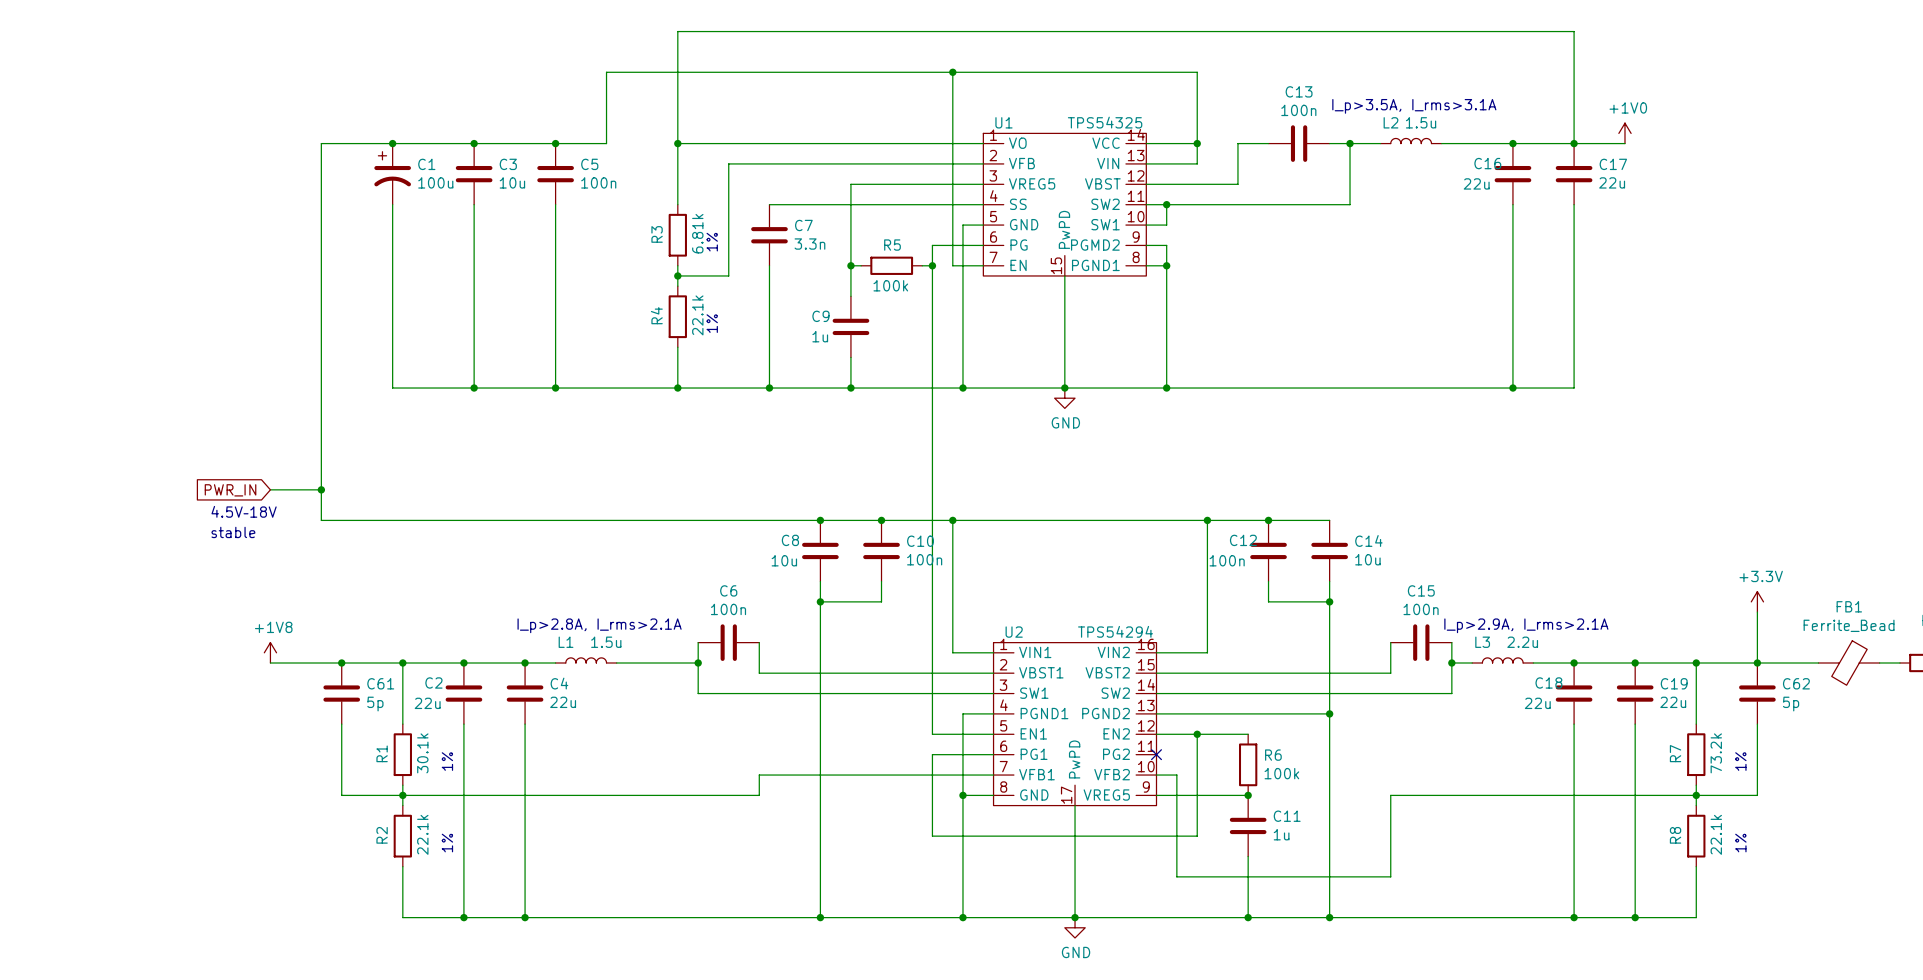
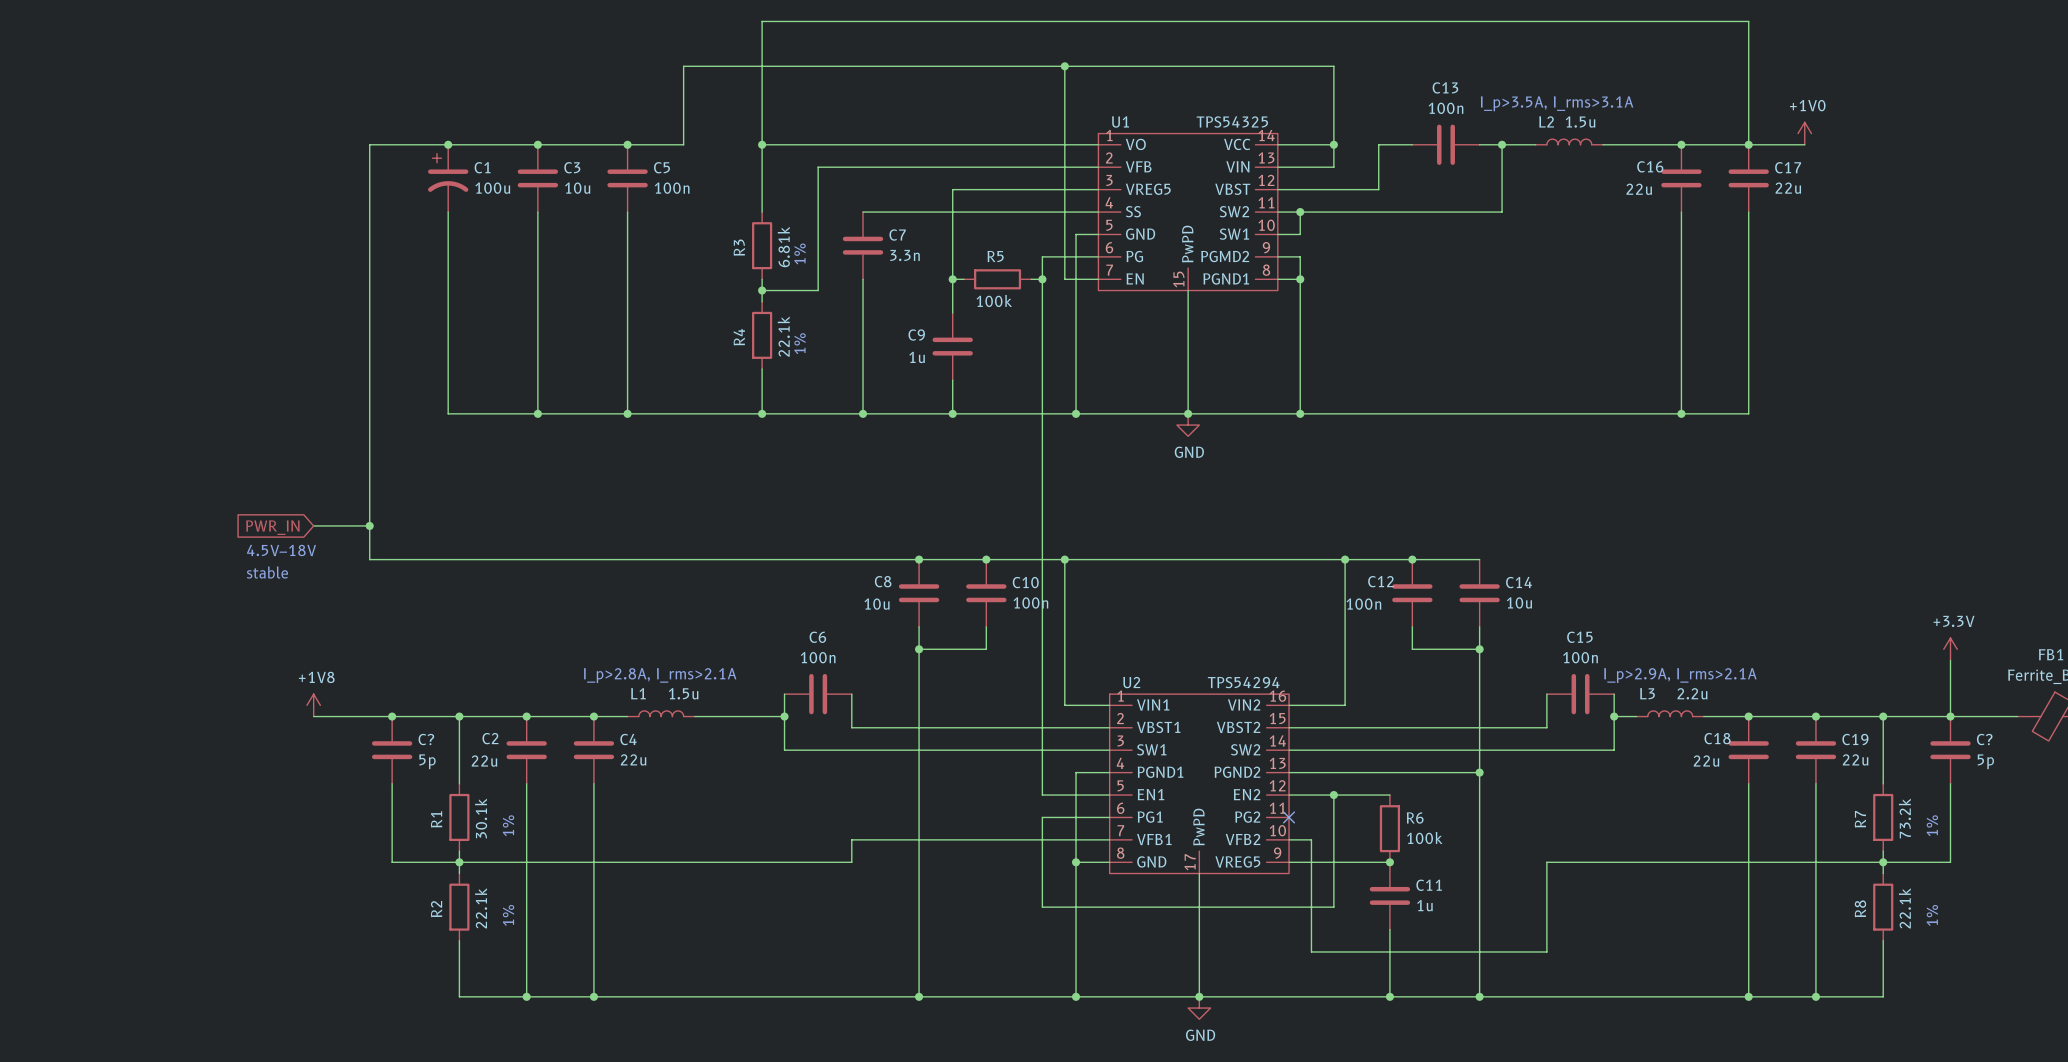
C61 name: C61 (380, 683) -> C? (426, 739)
C62 name: C62 (1796, 683) -> C? (1984, 739)

